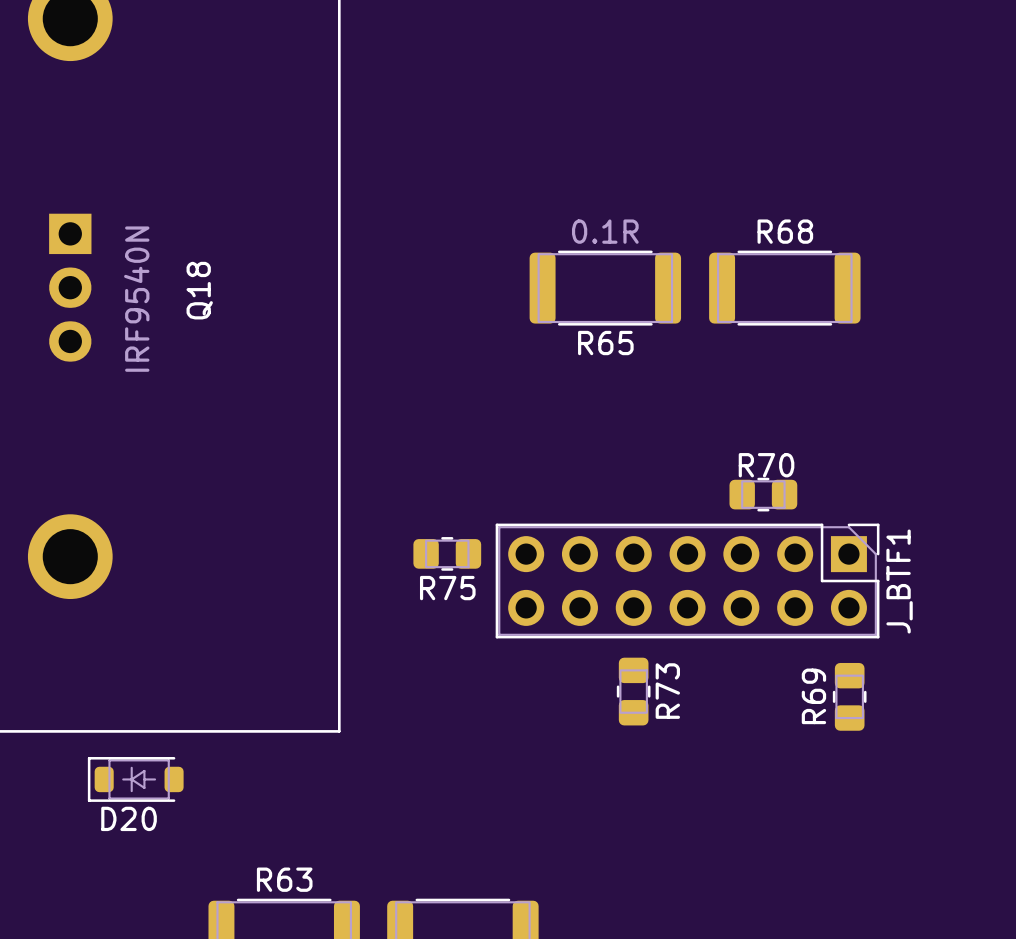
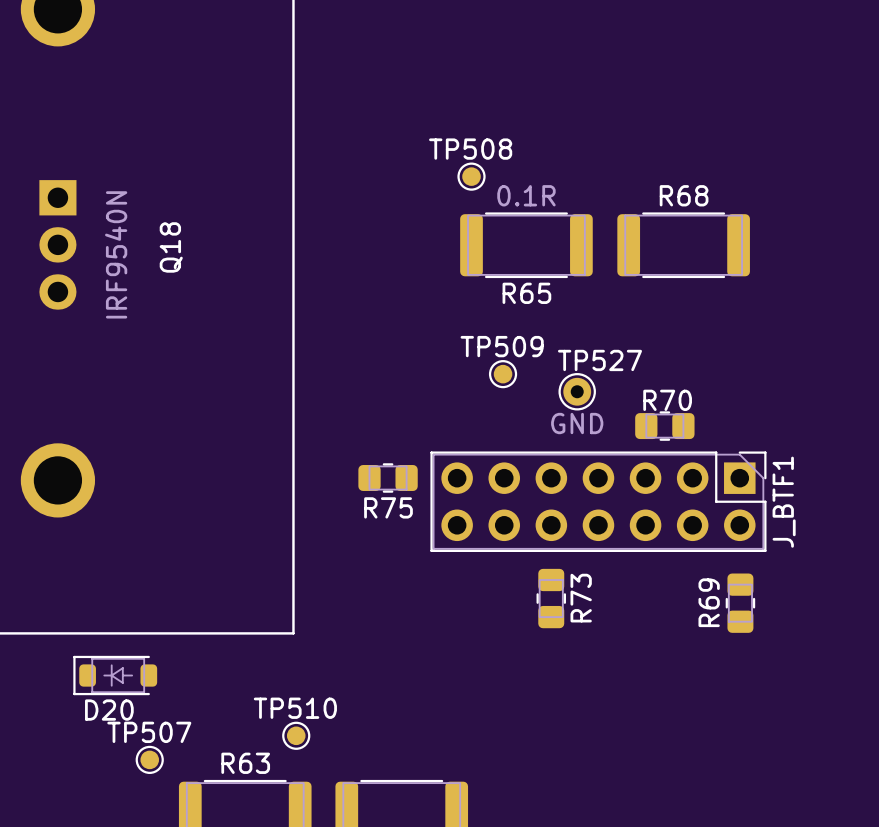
TP508: none -> (471, 176)
TP509: none -> (503, 374)
TP527: none -> GND (577, 391)
TP510: none -> (296, 735)
TP507: none -> (149, 759)

